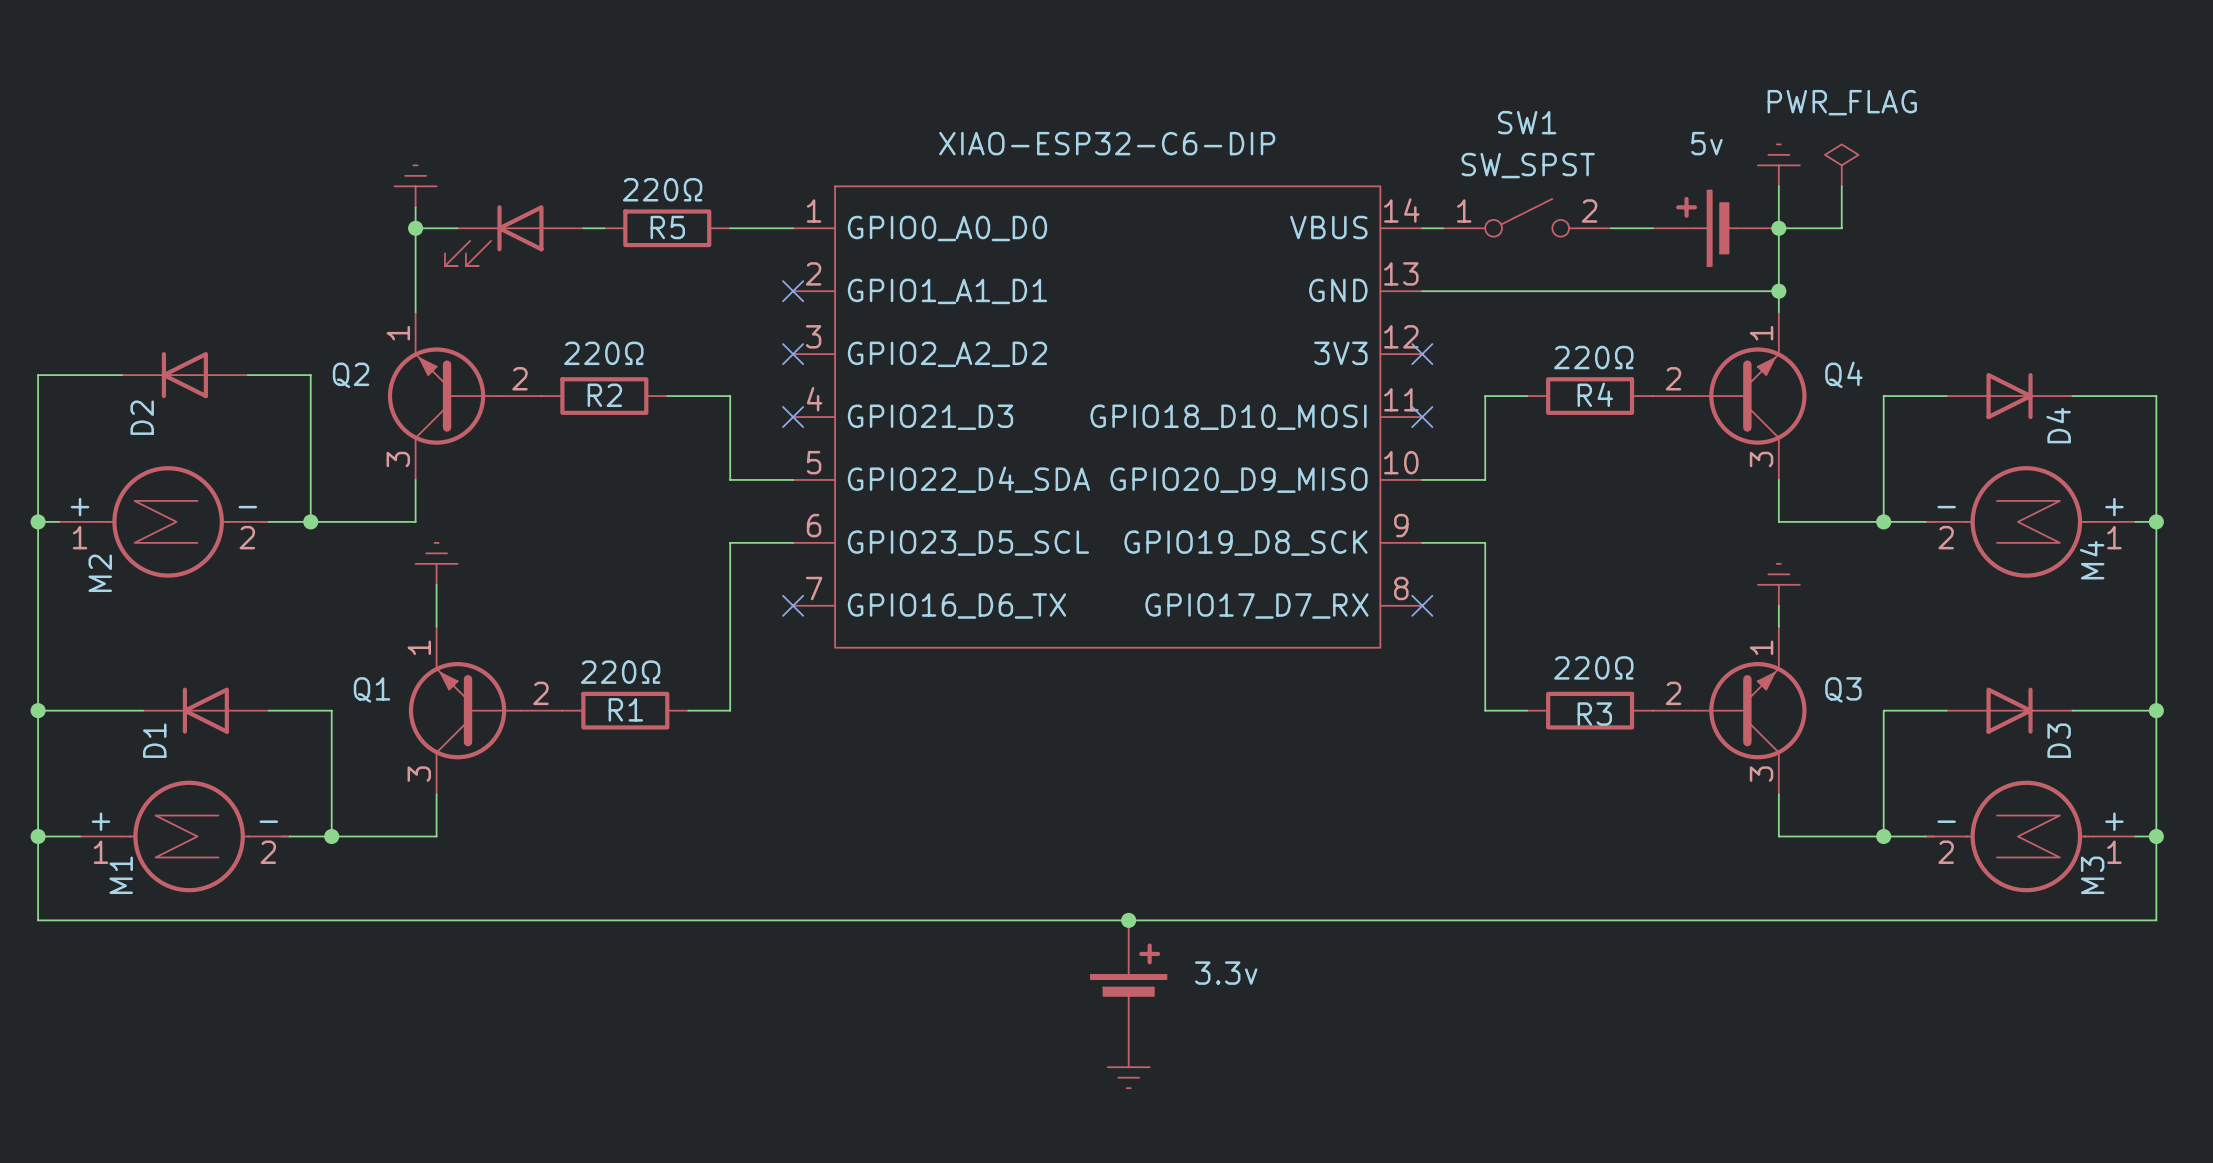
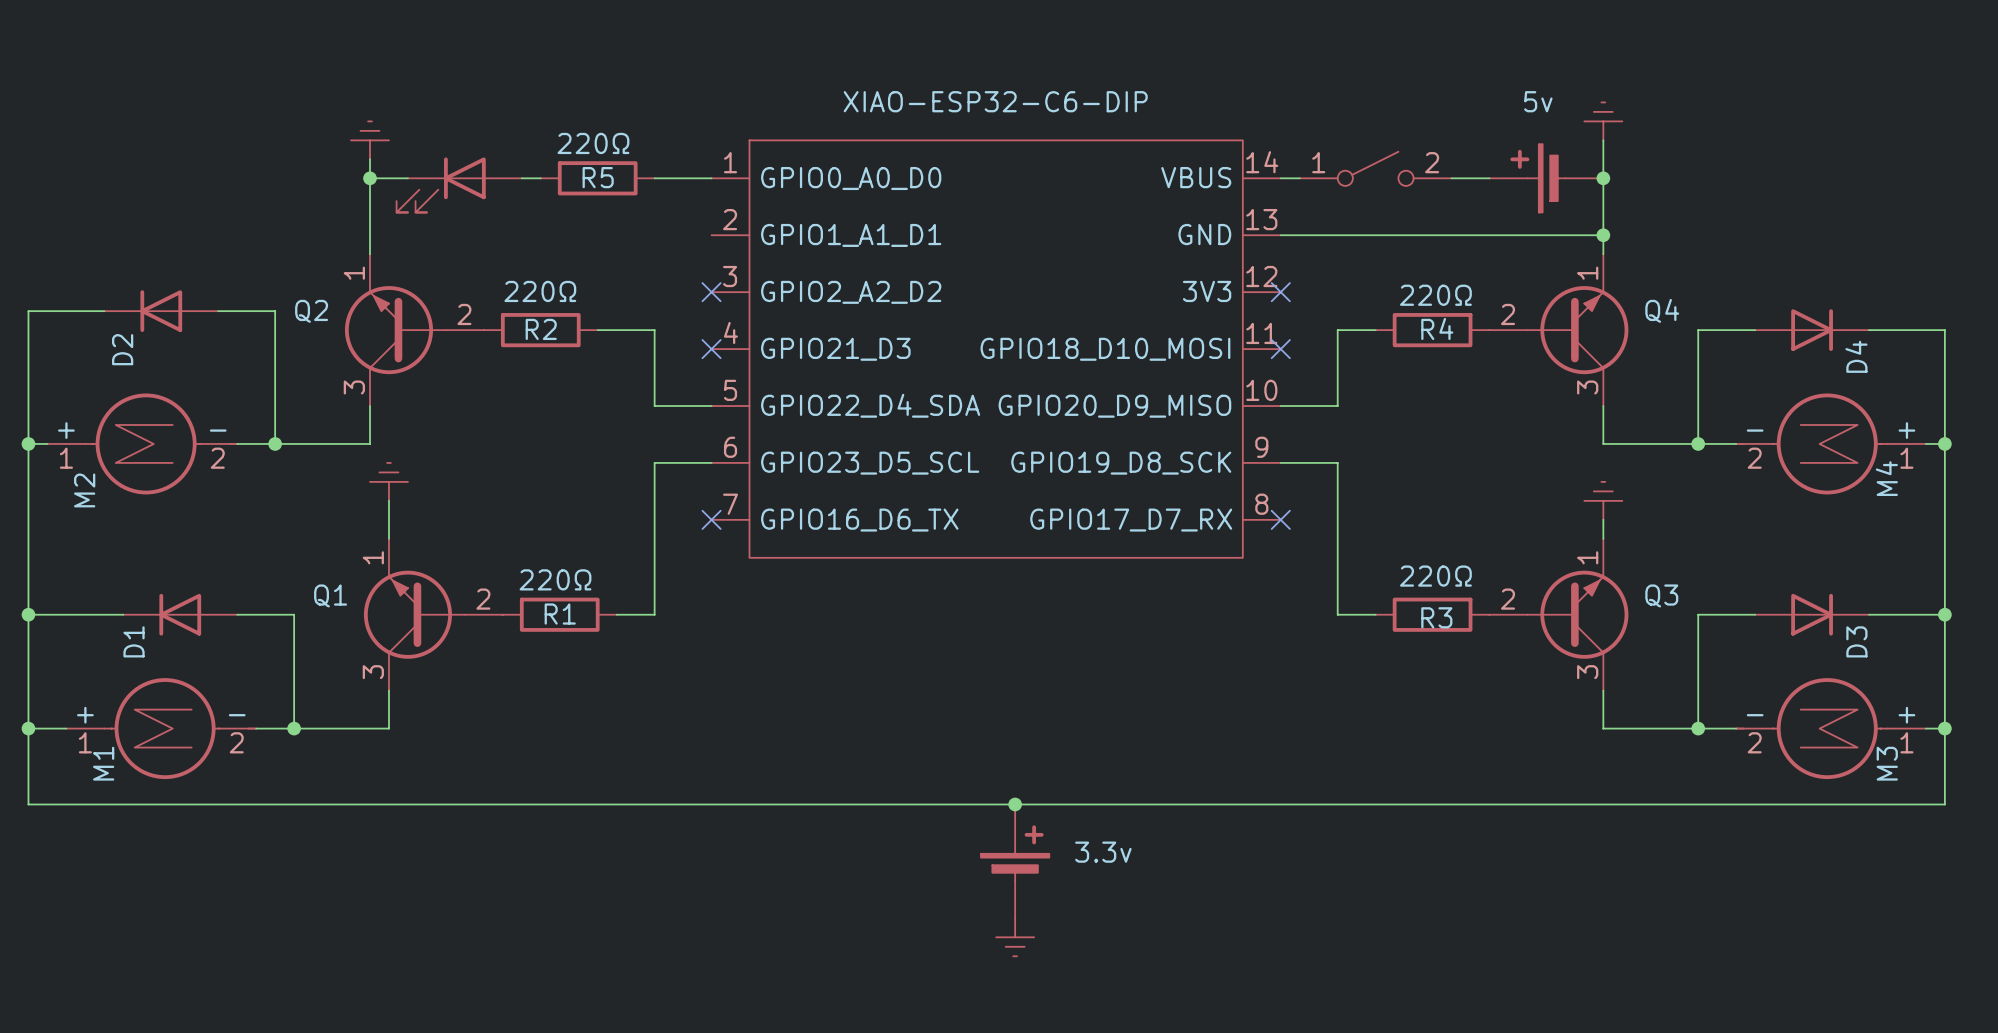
SW1 name: SW1 (1527, 122) -> none
SW1 value: SW_SPST (1528, 165) -> none
power symbol: PWR_FLAG (1841, 165) -> none
wire: (1841, 186) (1841, 228) (1778, 228) -> none
no-connect mark: (793, 291) -> none

